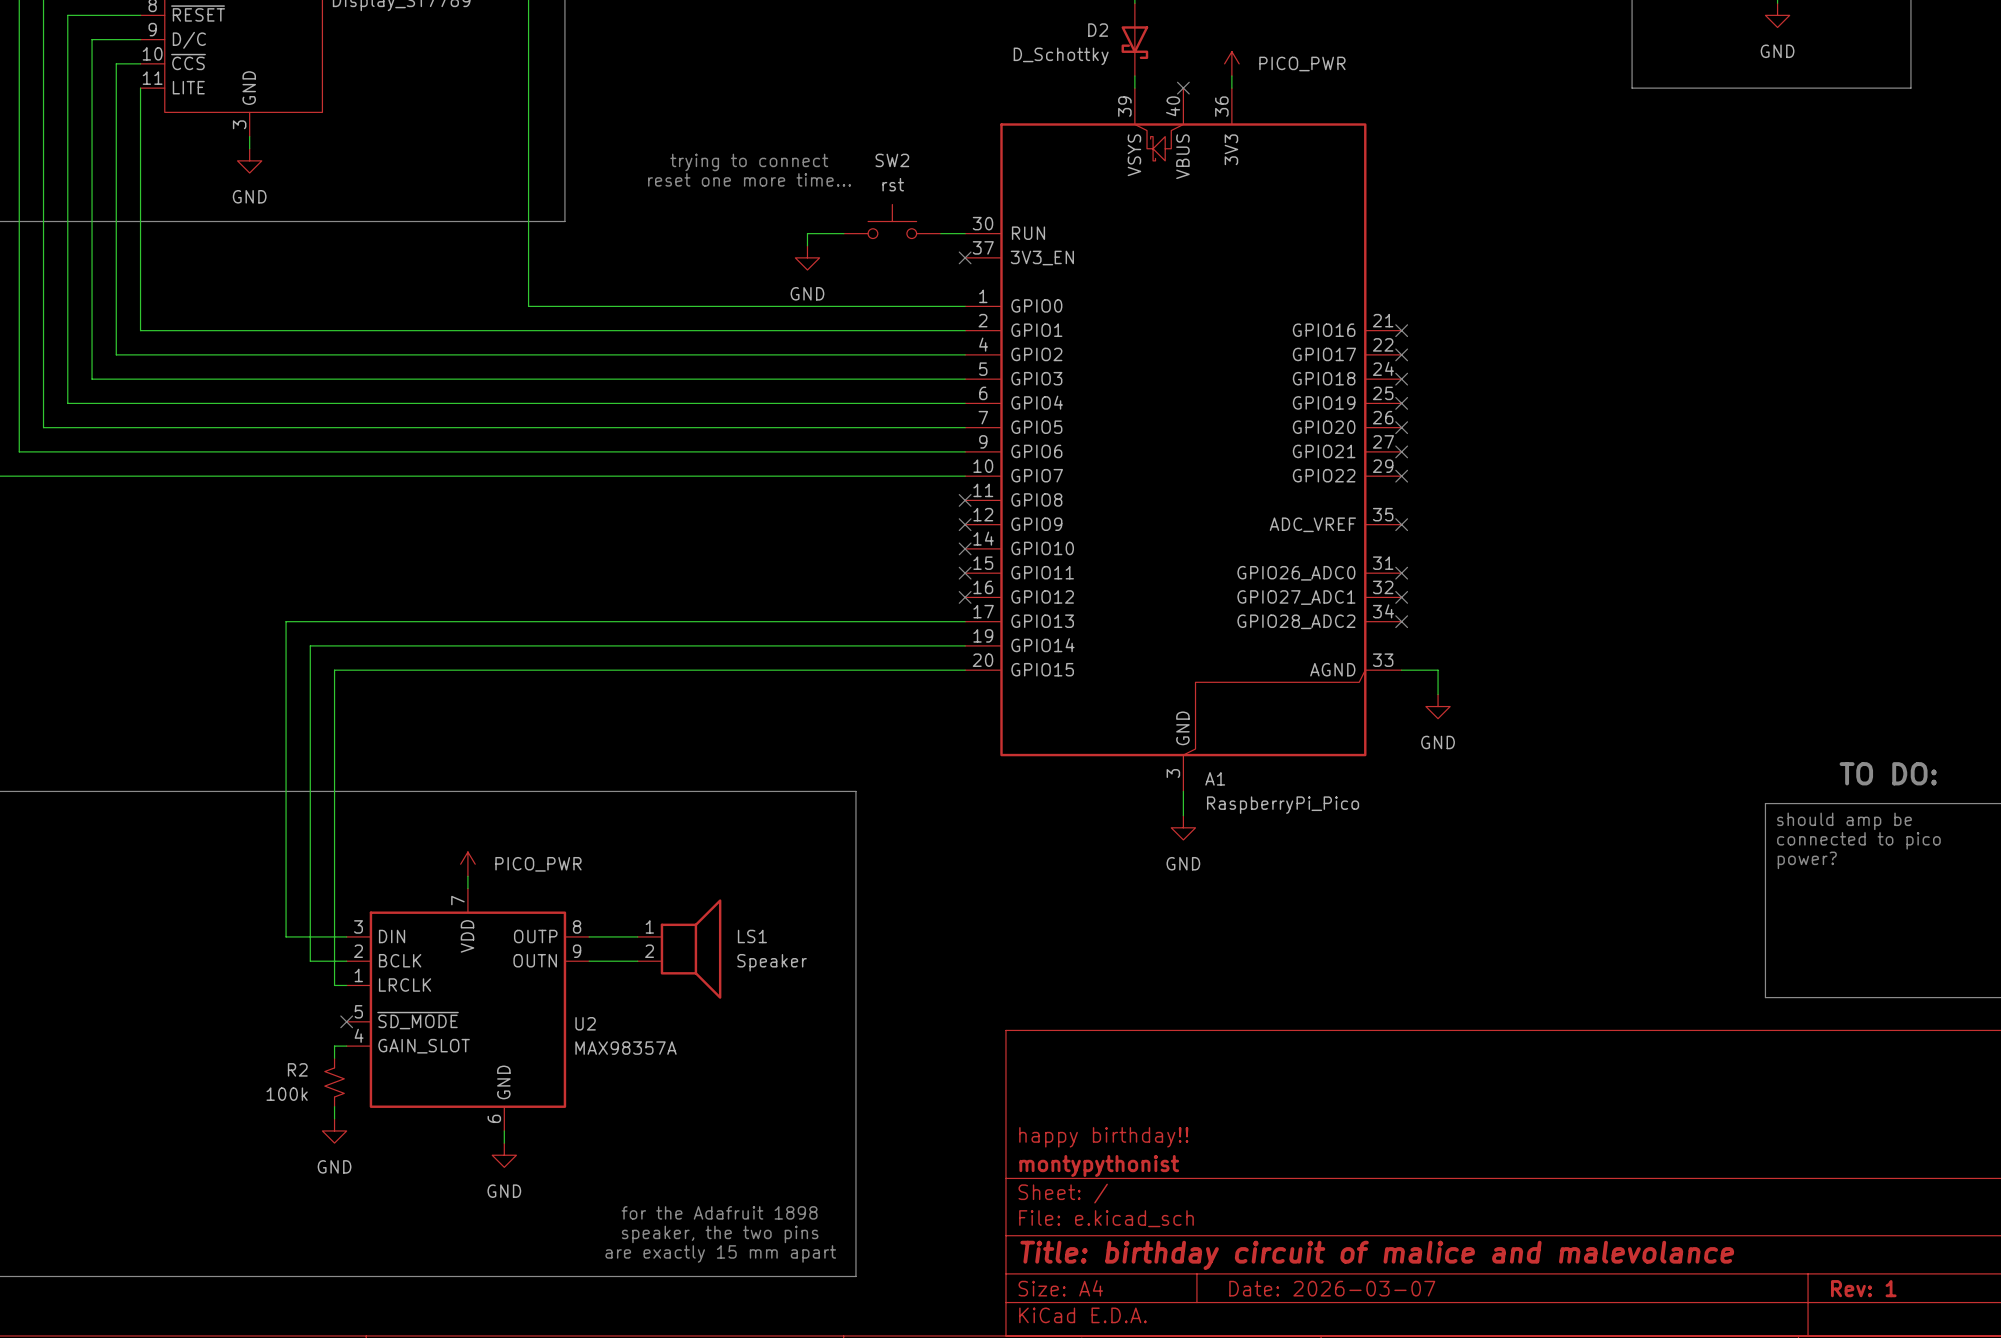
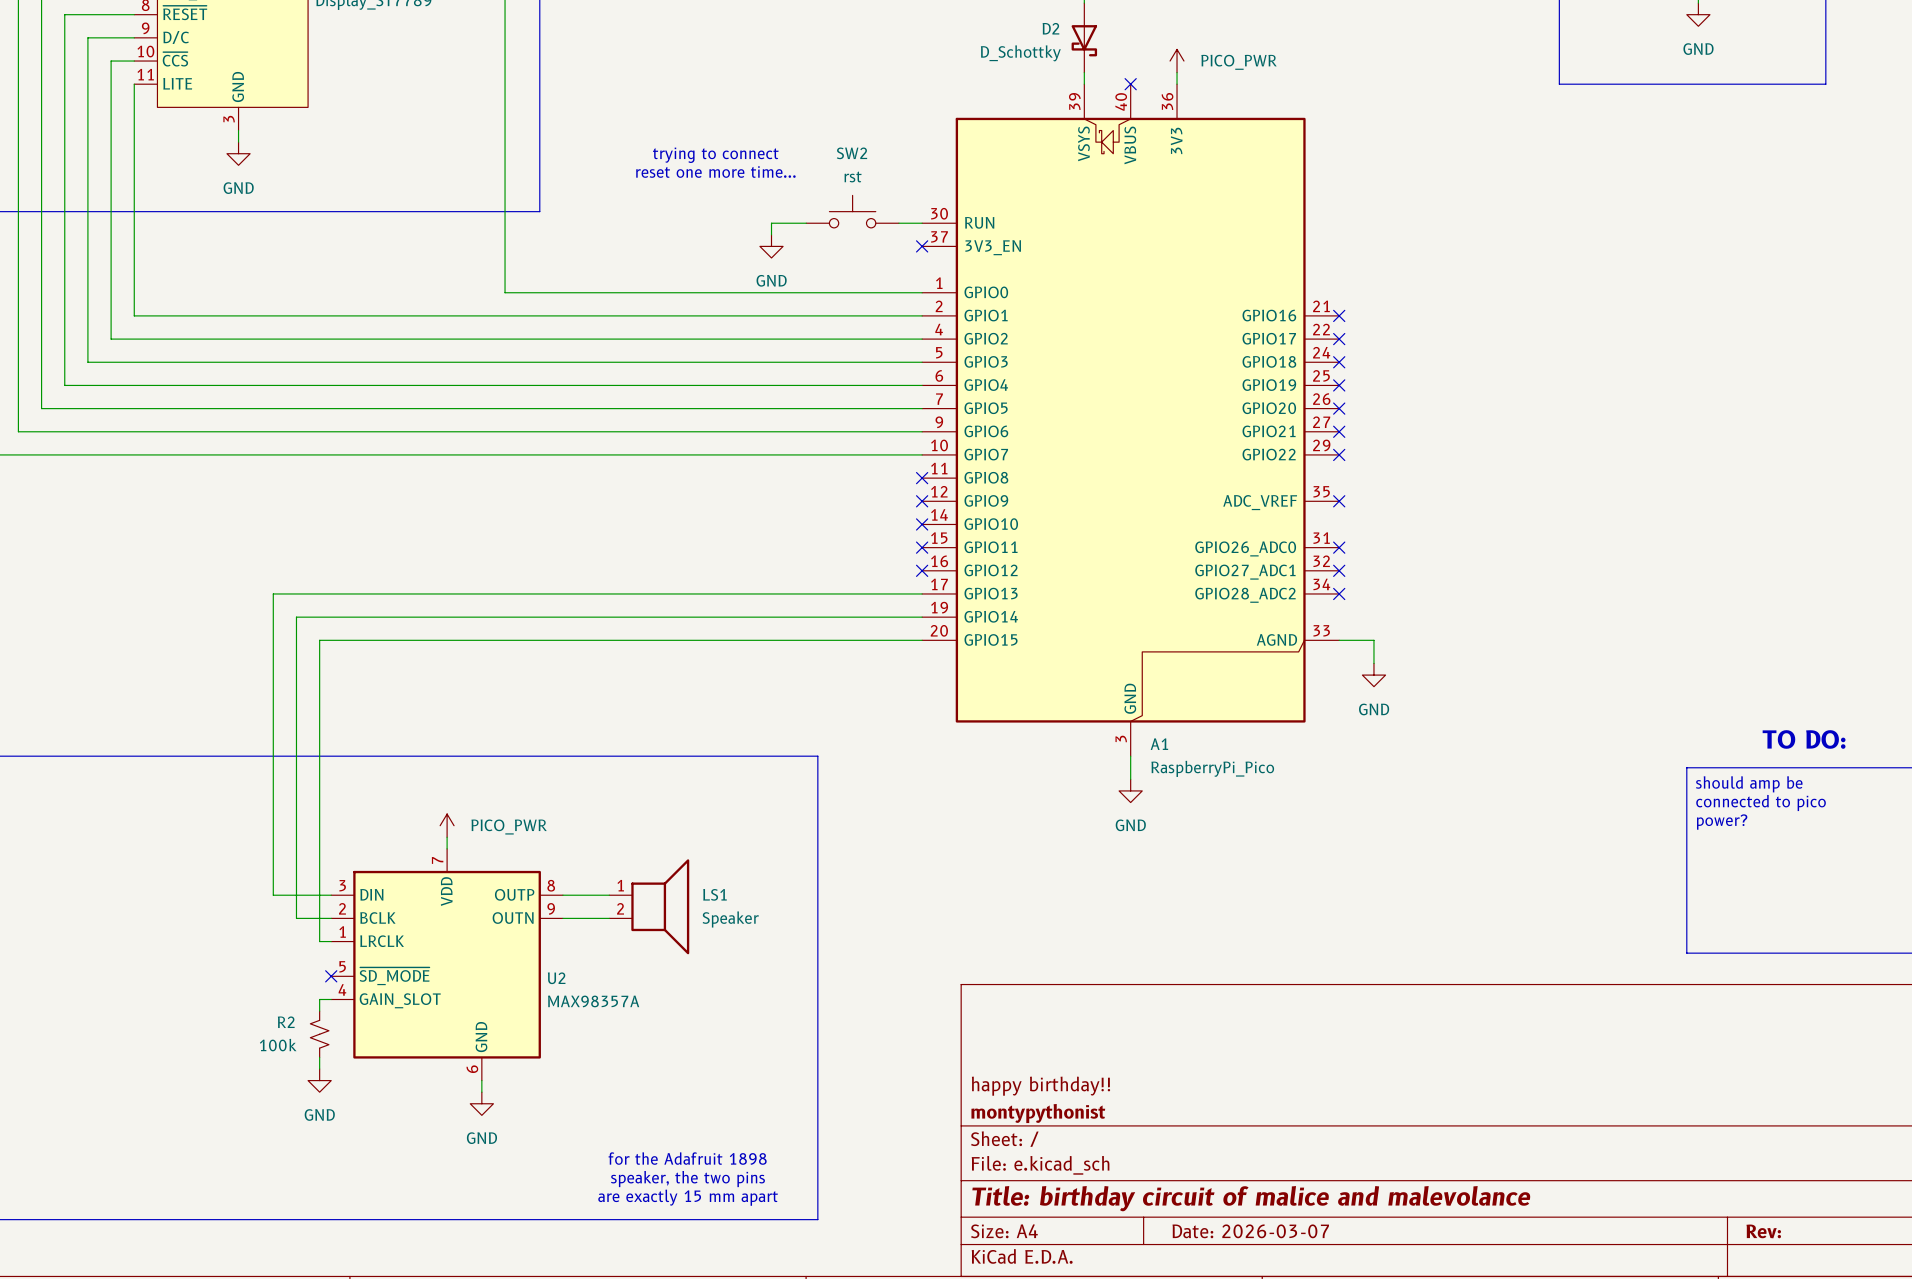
title block: Rev: 1 (1863, 1288) -> Rev: (1763, 1231)

